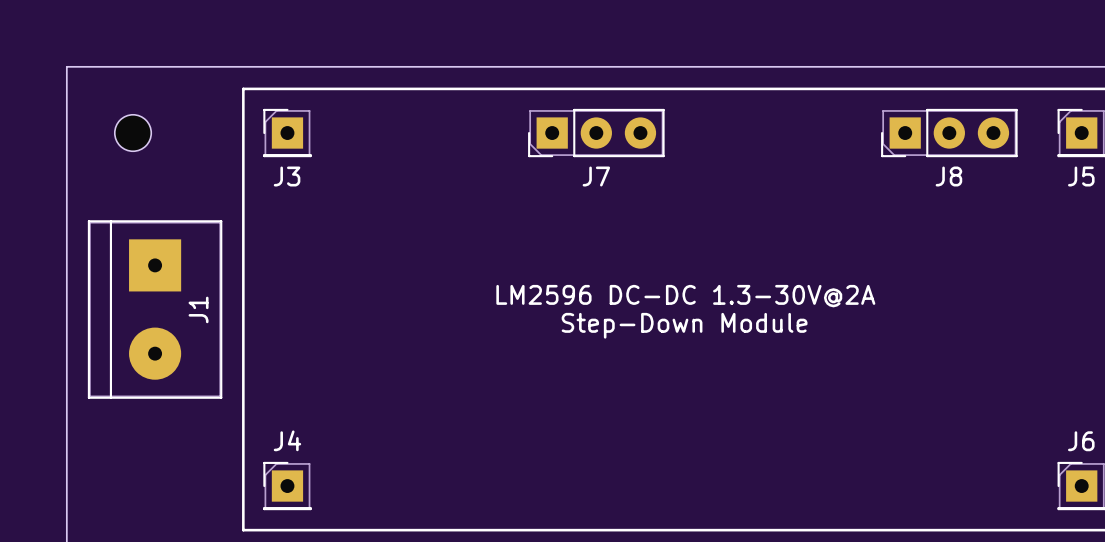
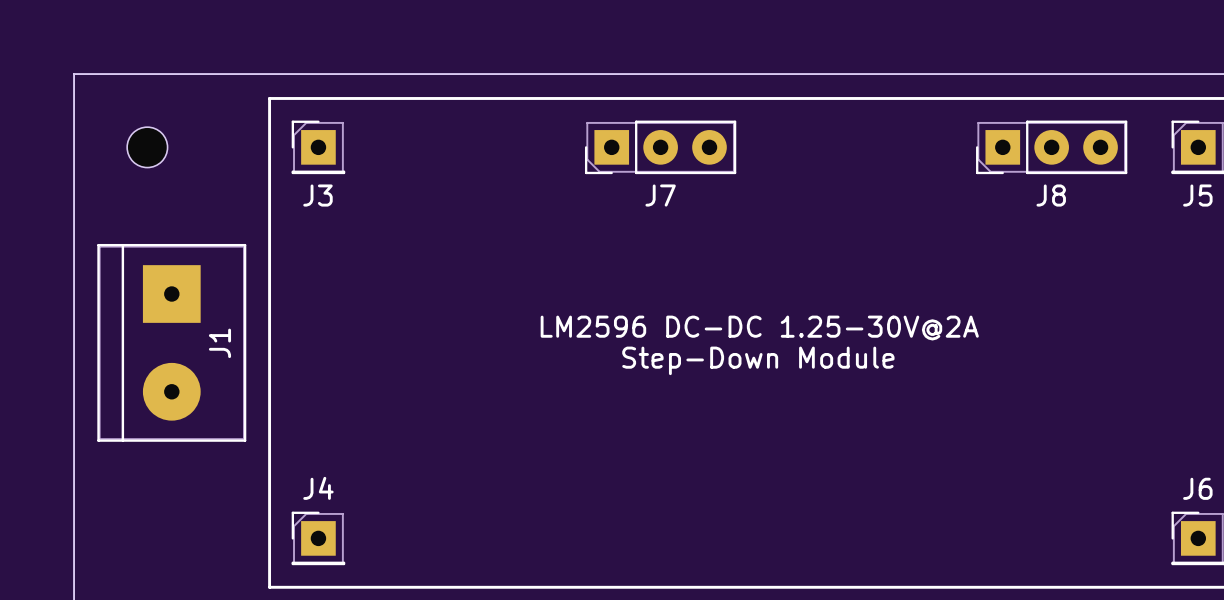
text: LM2596 DC-DC 1.3-30V@2A (685, 296) -> LM2596 DC-DC 1.25-30V@2A (759, 328)

